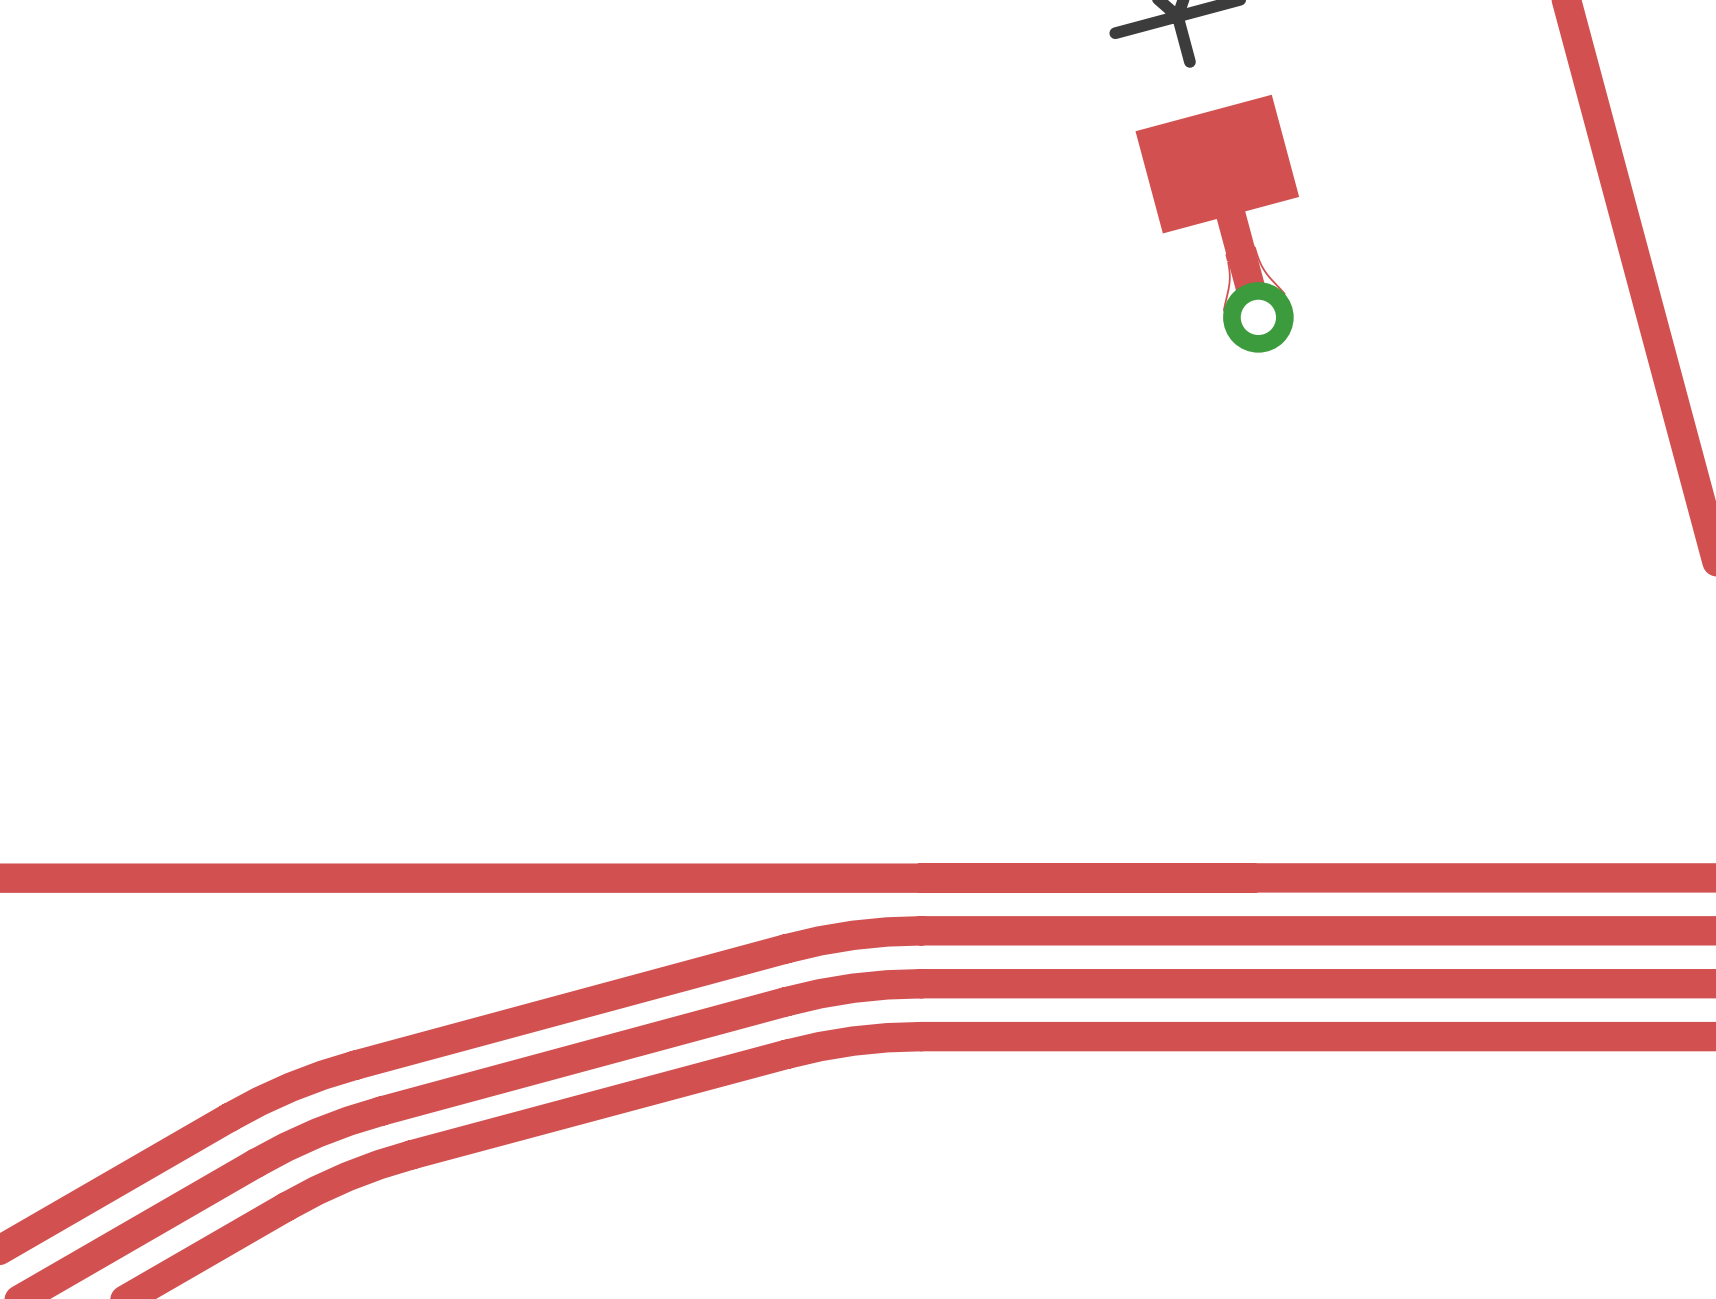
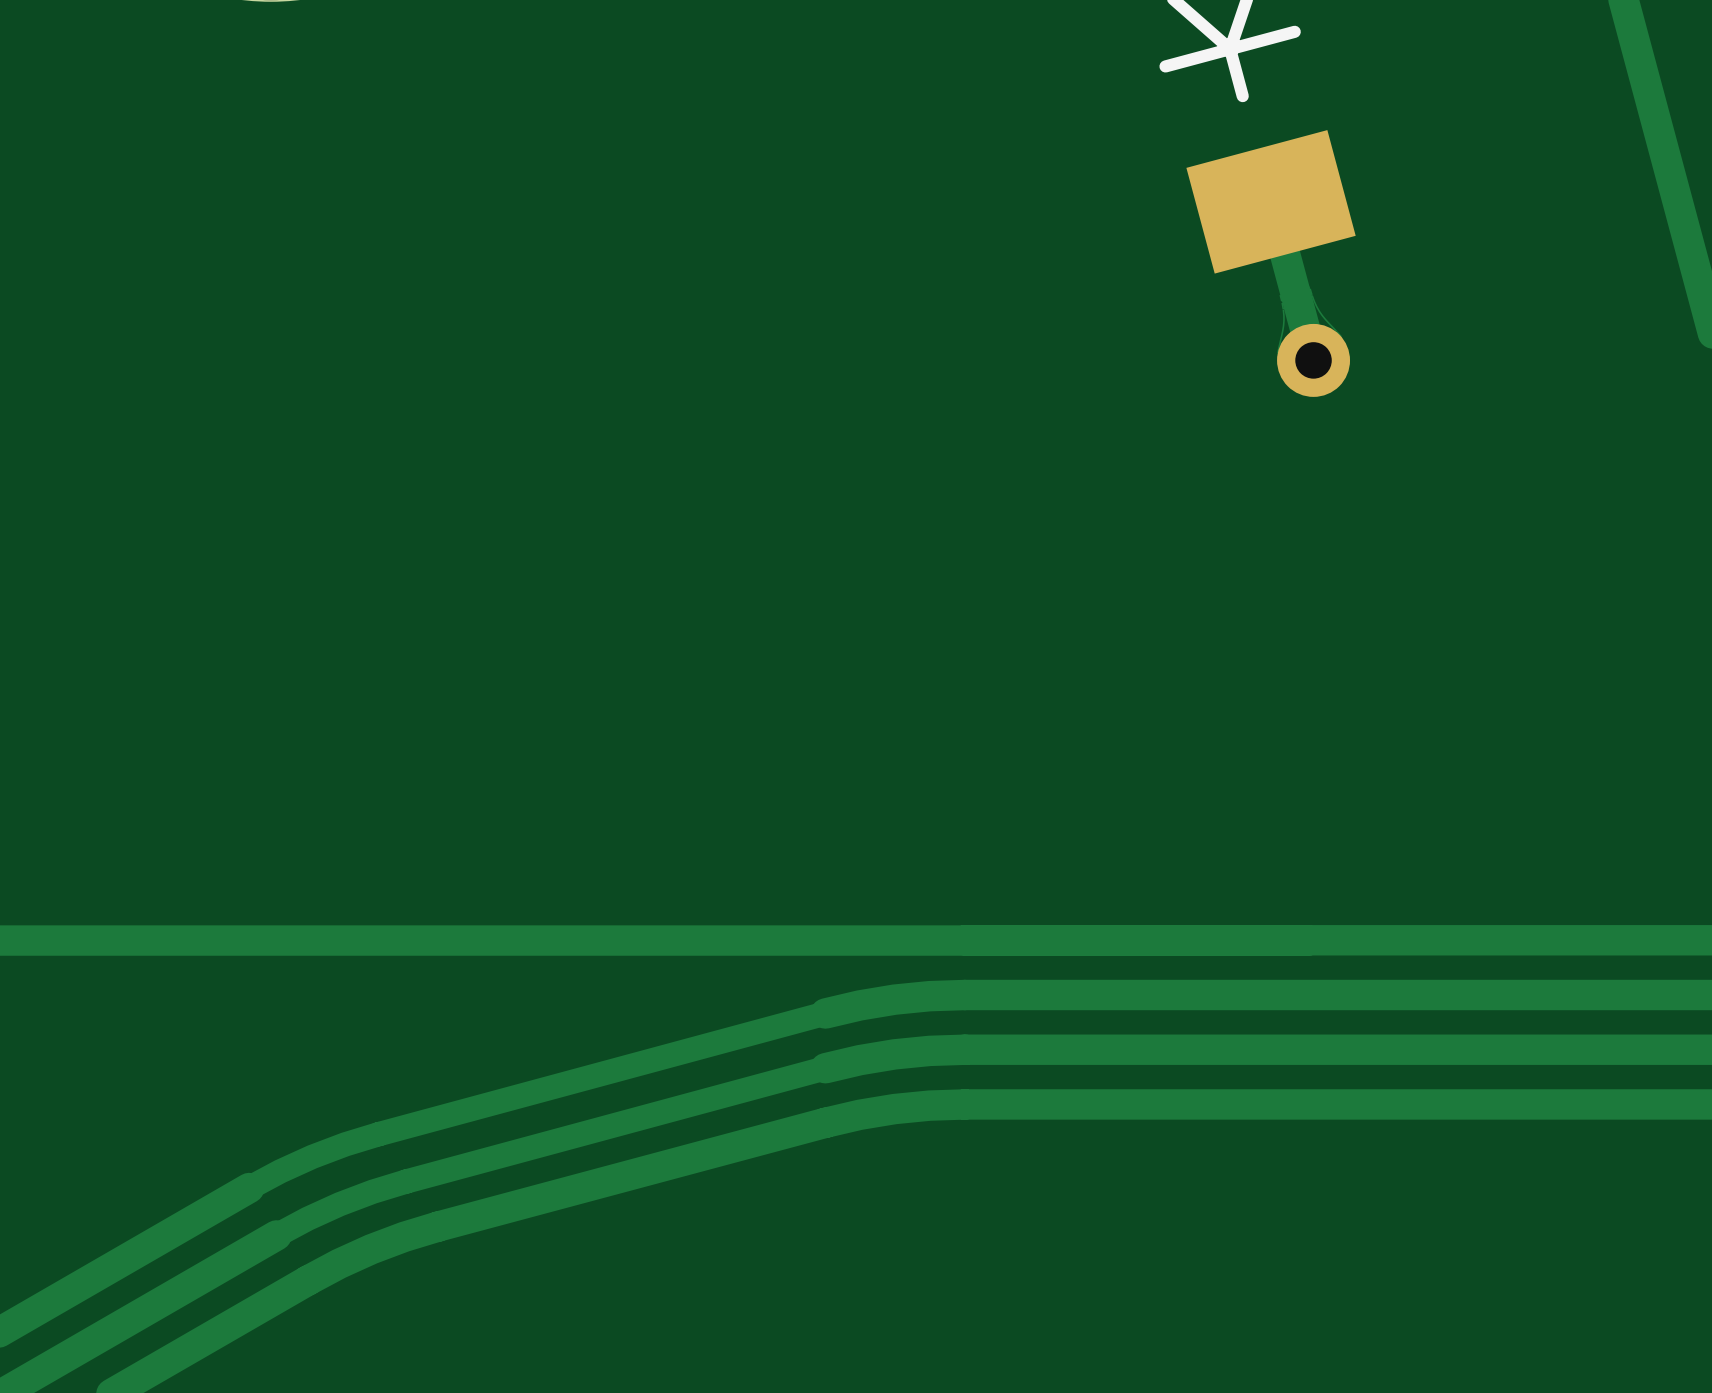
track width: thick (786, 948) (355, 1065) (290, 1087) (229, 1117) -> thin (825, 1013) (379, 1134) (312, 1156) (249, 1188)
track width: thick (786, 1001) (381, 1111) (317, 1133) (256, 1163) -> thin (825, 1068) (406, 1181) (339, 1204) (276, 1235)

